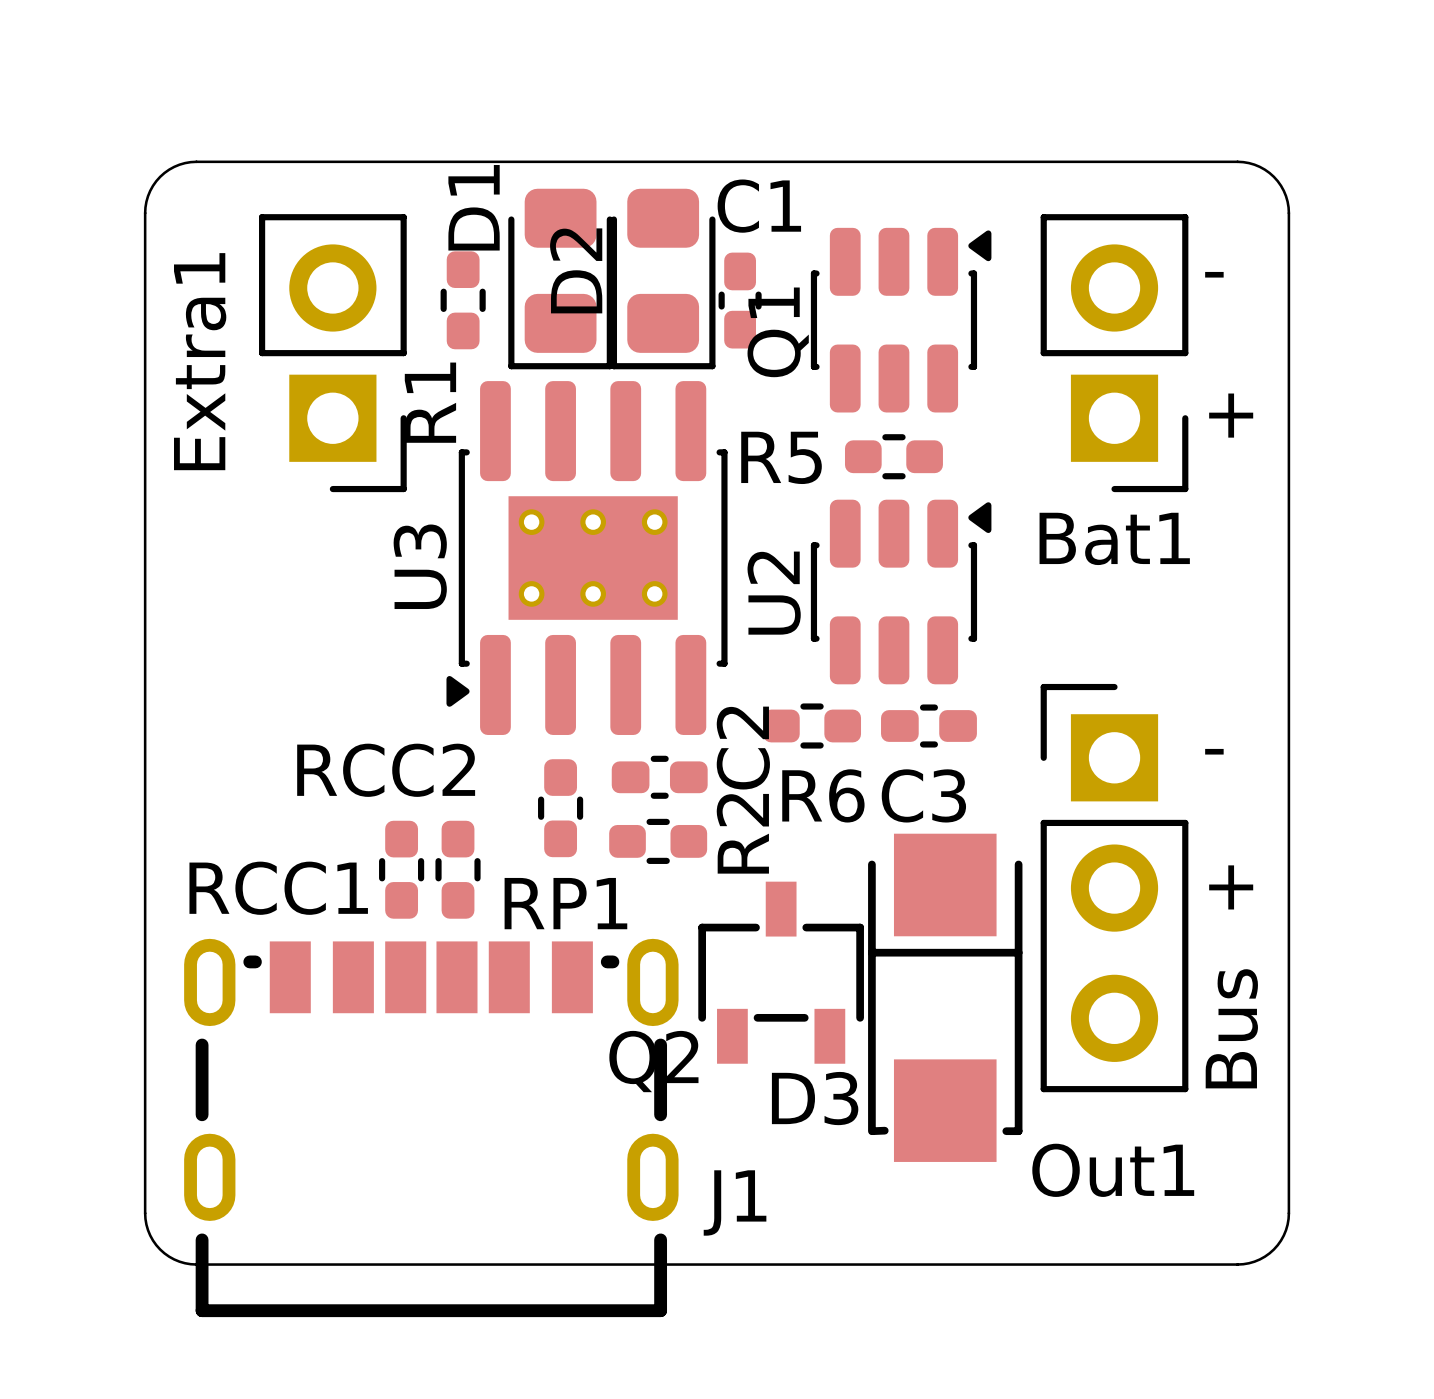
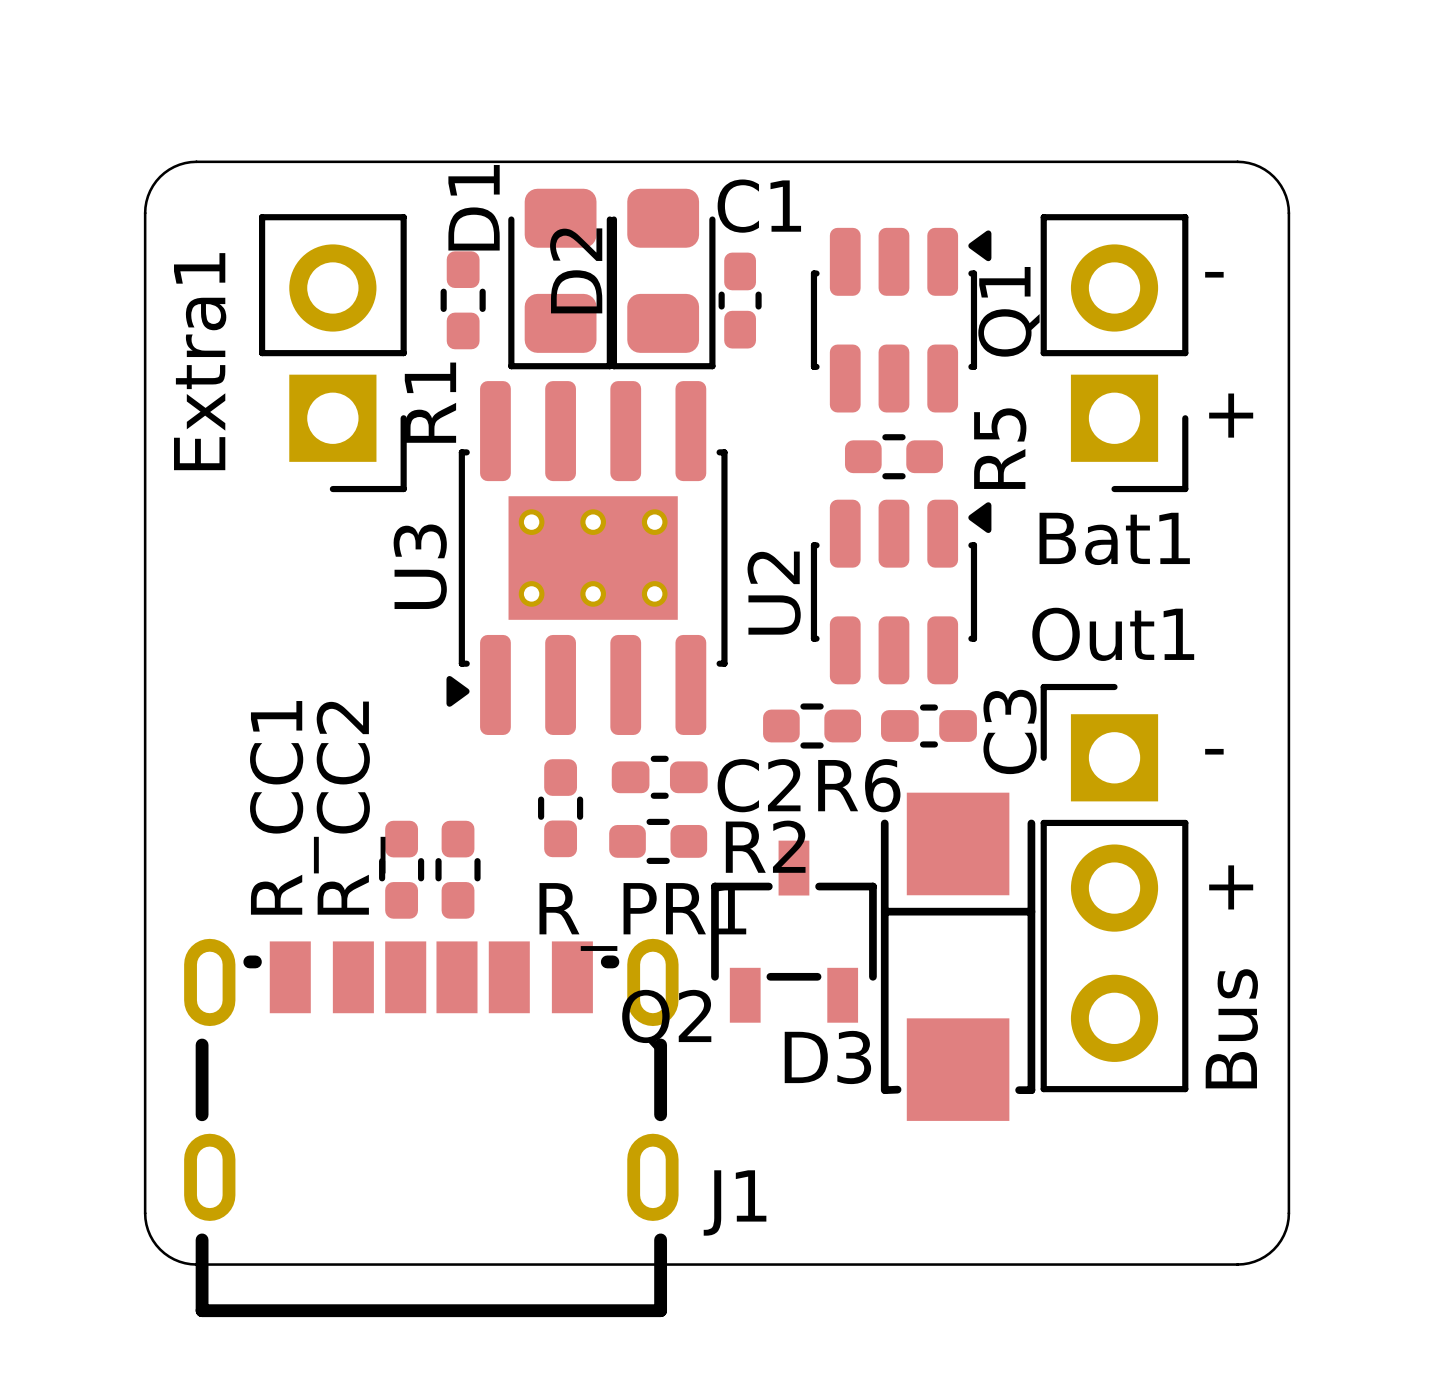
Q1 name position: Q1 (778, 332) -> Q1 (1008, 311)
R5 name rotation: 0° (781, 457) -> 90° counterclockwise (1000, 448)
R5 name position: R5 (781, 457) -> R5 (1000, 448)
C2 name rotation: 0° (743, 748) -> 90° clockwise (759, 785)
RCC2 name: RCC2 (386, 770) -> R_CC2 (351, 808)
R6 name position: R6 (823, 795) -> R6 (859, 785)
C3 name rotation: 0° (923, 795) -> 90° counterclockwise (1010, 731)
R2 name rotation: 0° (742, 833) -> 90° clockwise (765, 846)
RCC1 name: RCC1 (278, 888) -> R_CC1 (284, 807)
RP1 name: RP1 (565, 903) -> R_PR1 (642, 917)
Q2 position: (781, 972) -> (793, 931)
D3 position: (945, 997) -> (958, 956)
Out1 name position: Out1 (1113, 1170) -> Out1 (1113, 634)

